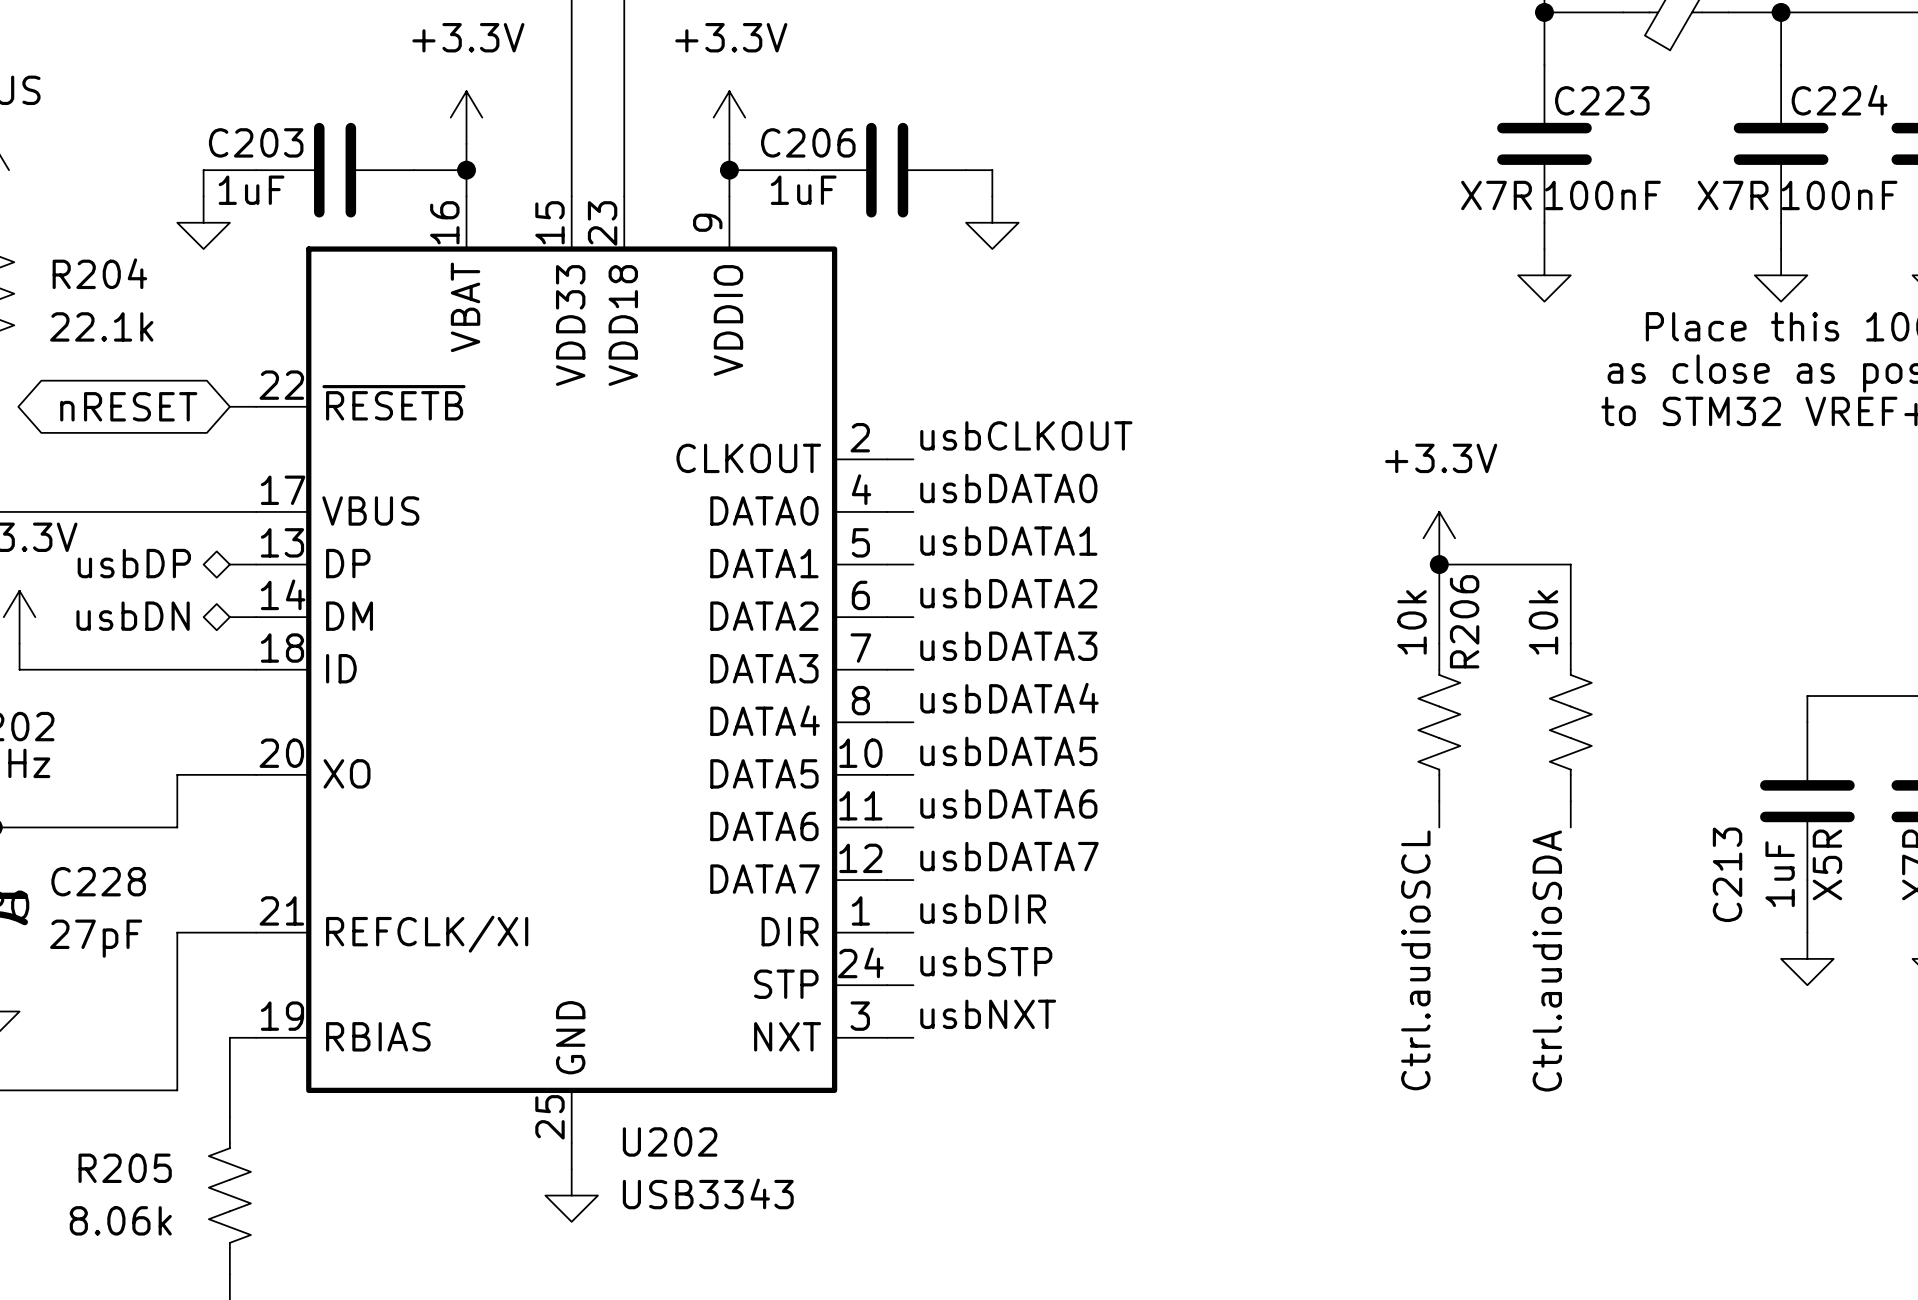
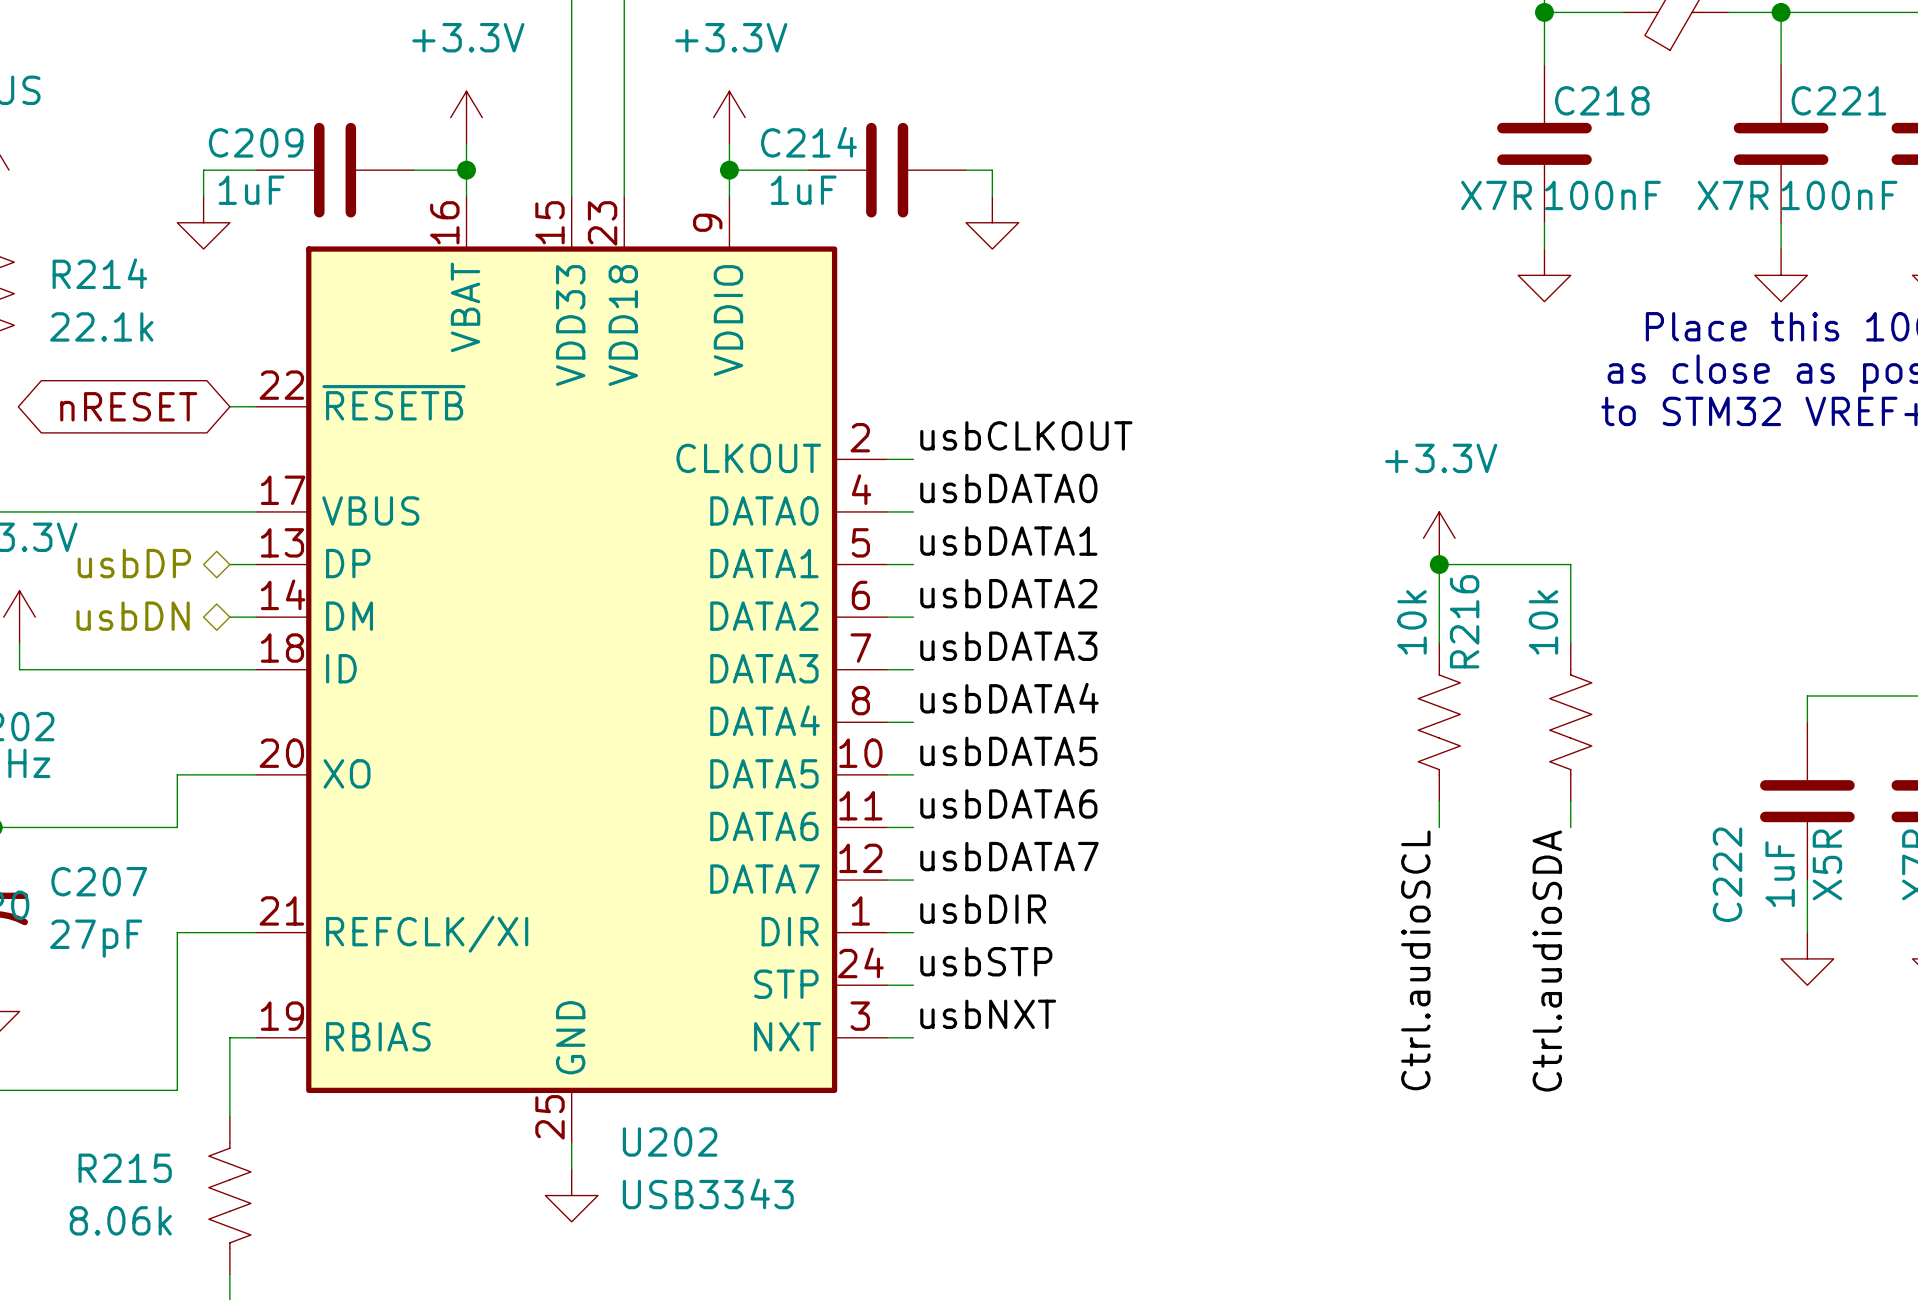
C223 name: C223 (1602, 100) -> C218 (1602, 100)
C224 name: C224 (1839, 100) -> C221 (1838, 100)
C203 name: C203 (256, 142) -> C209 (256, 142)
C206 name: C206 (808, 142) -> C214 (808, 142)
R204 name: R204 (99, 273) -> R214 (99, 273)
R206 name: R206 (1464, 621) -> R216 (1464, 621)
C213 name: C213 (1727, 874) -> C222 (1727, 874)
C228 name: C228 (98, 881) -> C207 (99, 881)
R205 name: R205 (125, 1168) -> R215 (125, 1168)

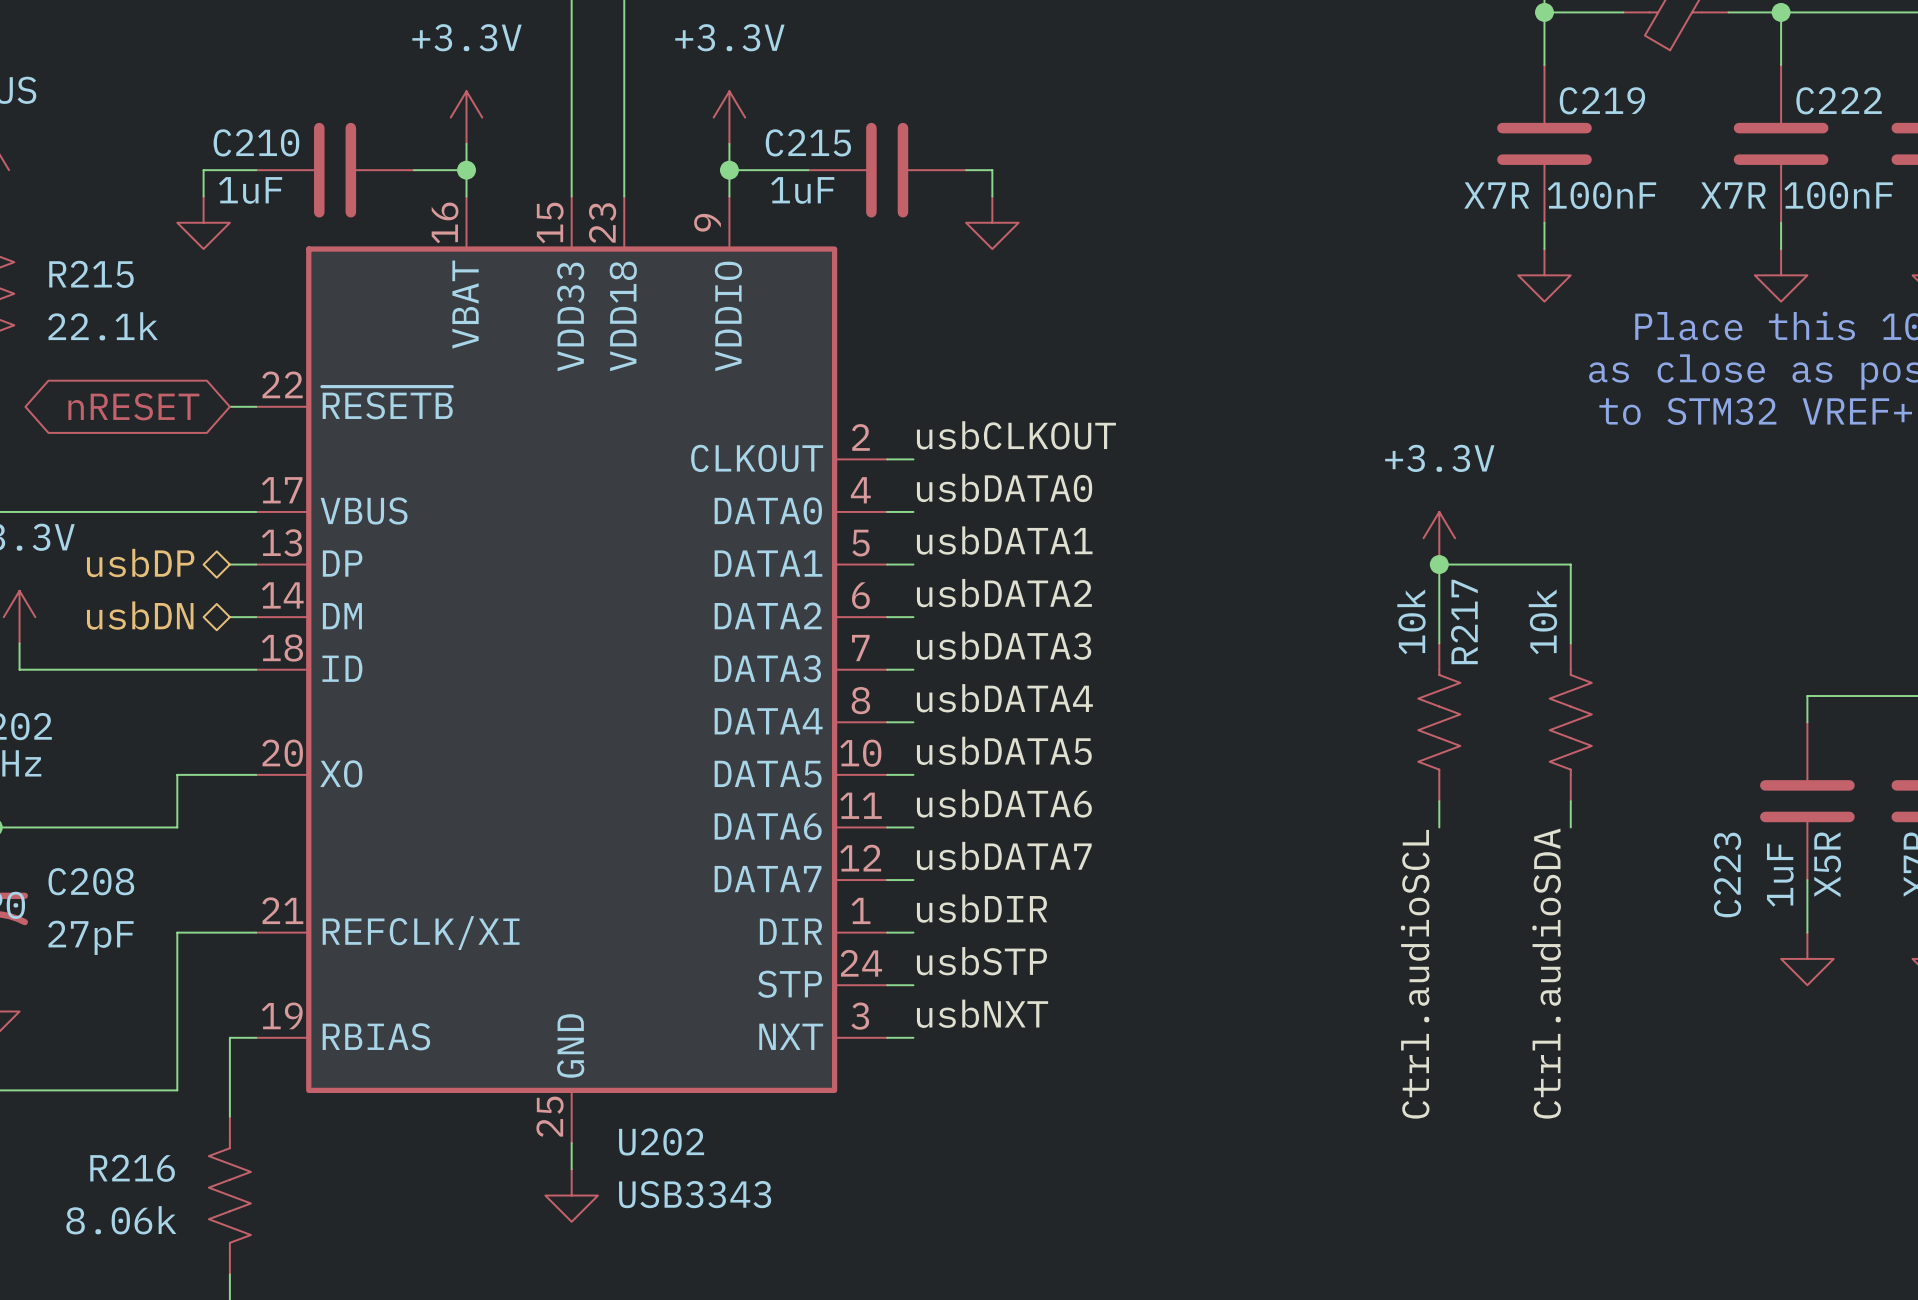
C218 name: C218 (1602, 100) -> C219 (1602, 100)
C221 name: C221 (1838, 100) -> C222 (1839, 100)
C209 name: C209 (256, 142) -> C210 (256, 142)
C214 name: C214 (808, 142) -> C215 (808, 142)
R214 name: R214 (99, 273) -> R215 (91, 274)
R216 name: R216 (1464, 621) -> R217 (1464, 621)
C222 name: C222 (1727, 874) -> C223 (1727, 875)
C207 name: C207 (99, 881) -> C208 (91, 881)
R215 name: R215 (125, 1168) -> R216 (132, 1168)

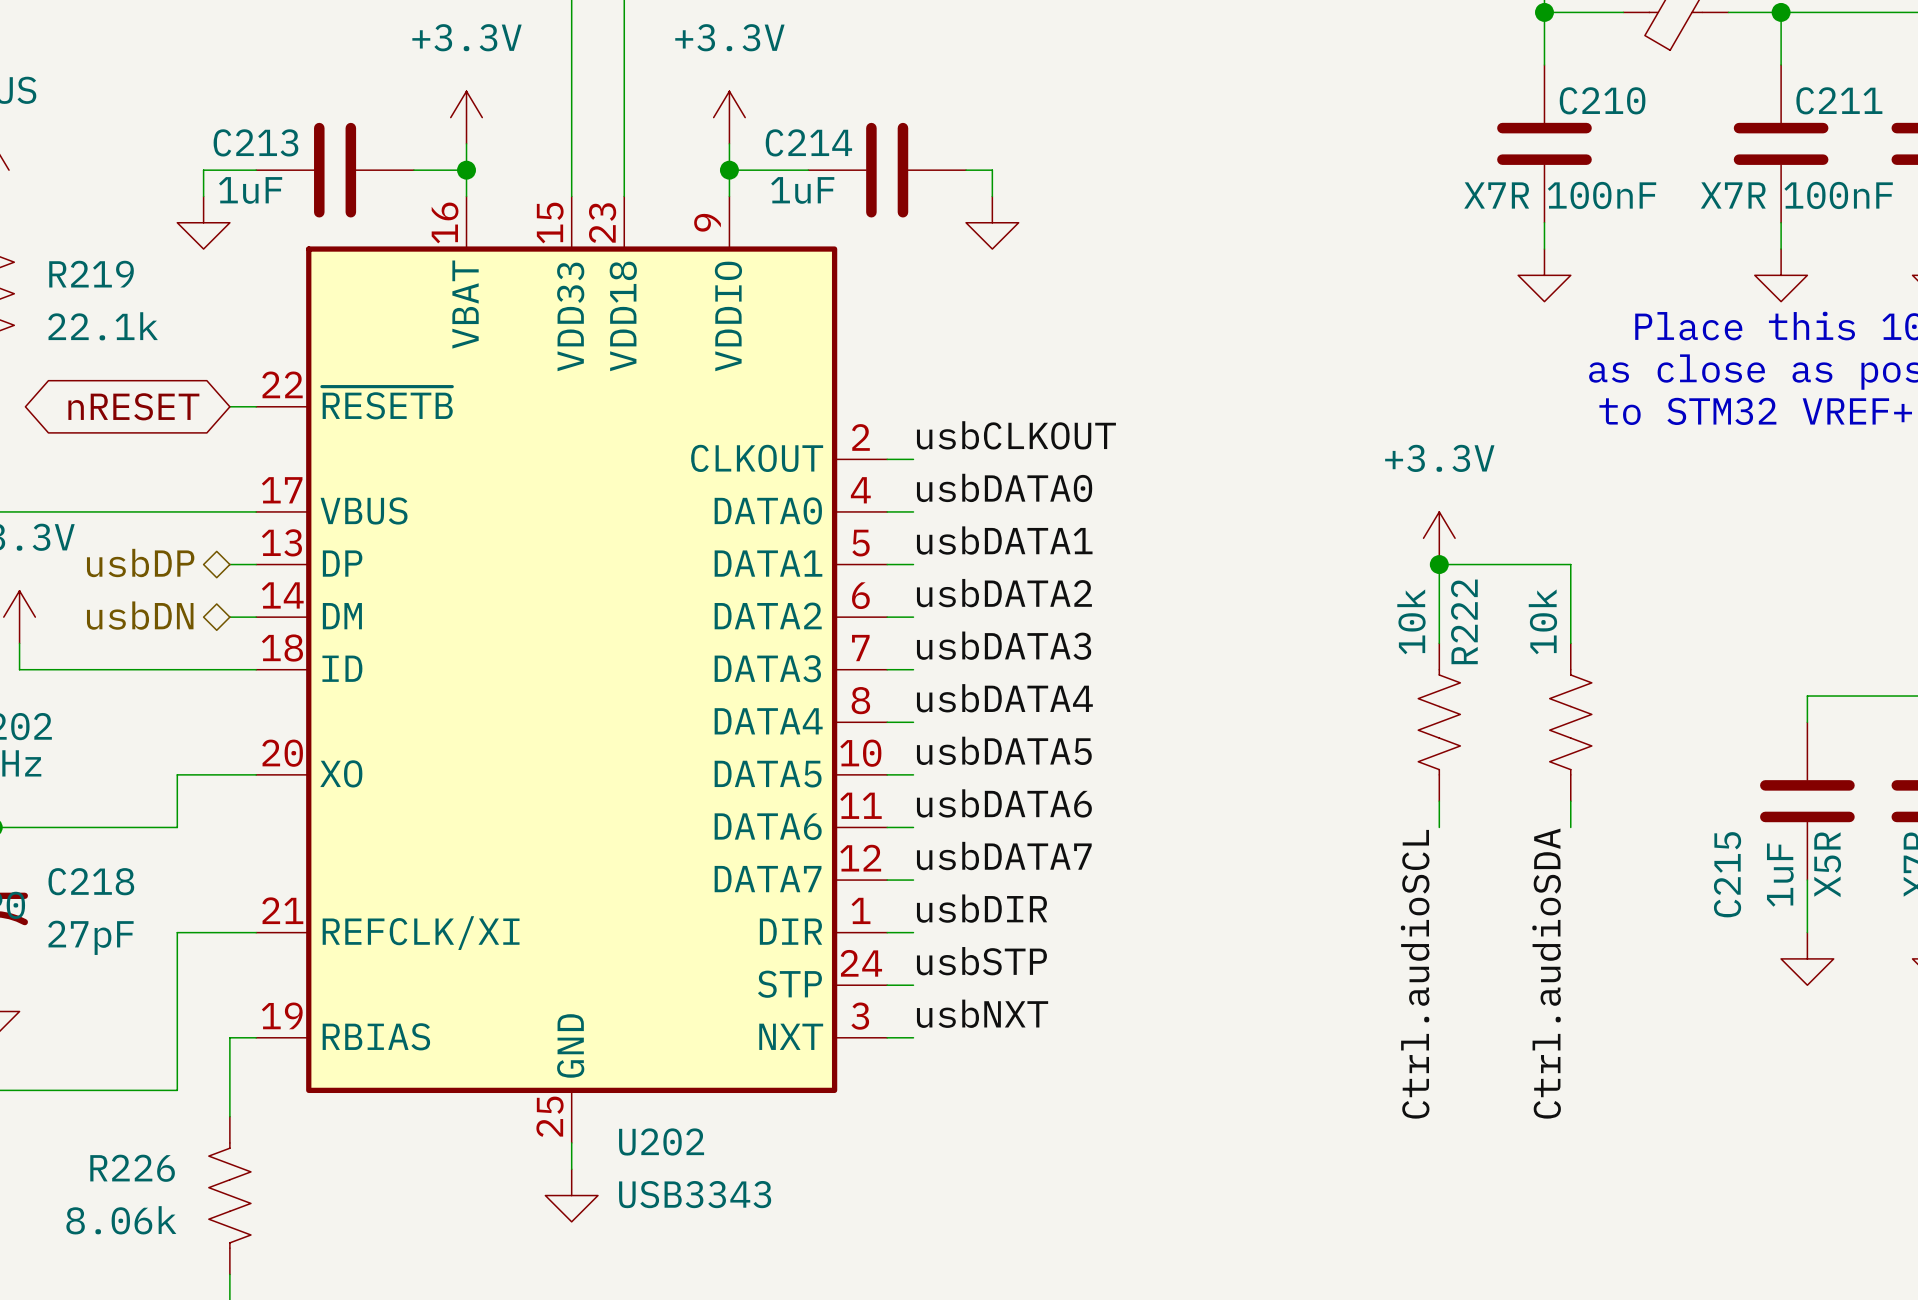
C219 name: C219 (1602, 100) -> C210 (1602, 100)
C222 name: C222 (1839, 100) -> C211 (1839, 100)
C210 name: C210 (256, 142) -> C213 (255, 142)
C215 name: C215 (808, 142) -> C214 (808, 142)
R215 name: R215 (91, 274) -> R219 (91, 274)
R217 name: R217 (1464, 621) -> R222 (1464, 621)
C223 name: C223 (1727, 875) -> C215 (1727, 874)
C208 name: C208 (91, 881) -> C218 (91, 881)
R216 name: R216 (132, 1168) -> R226 (132, 1168)

